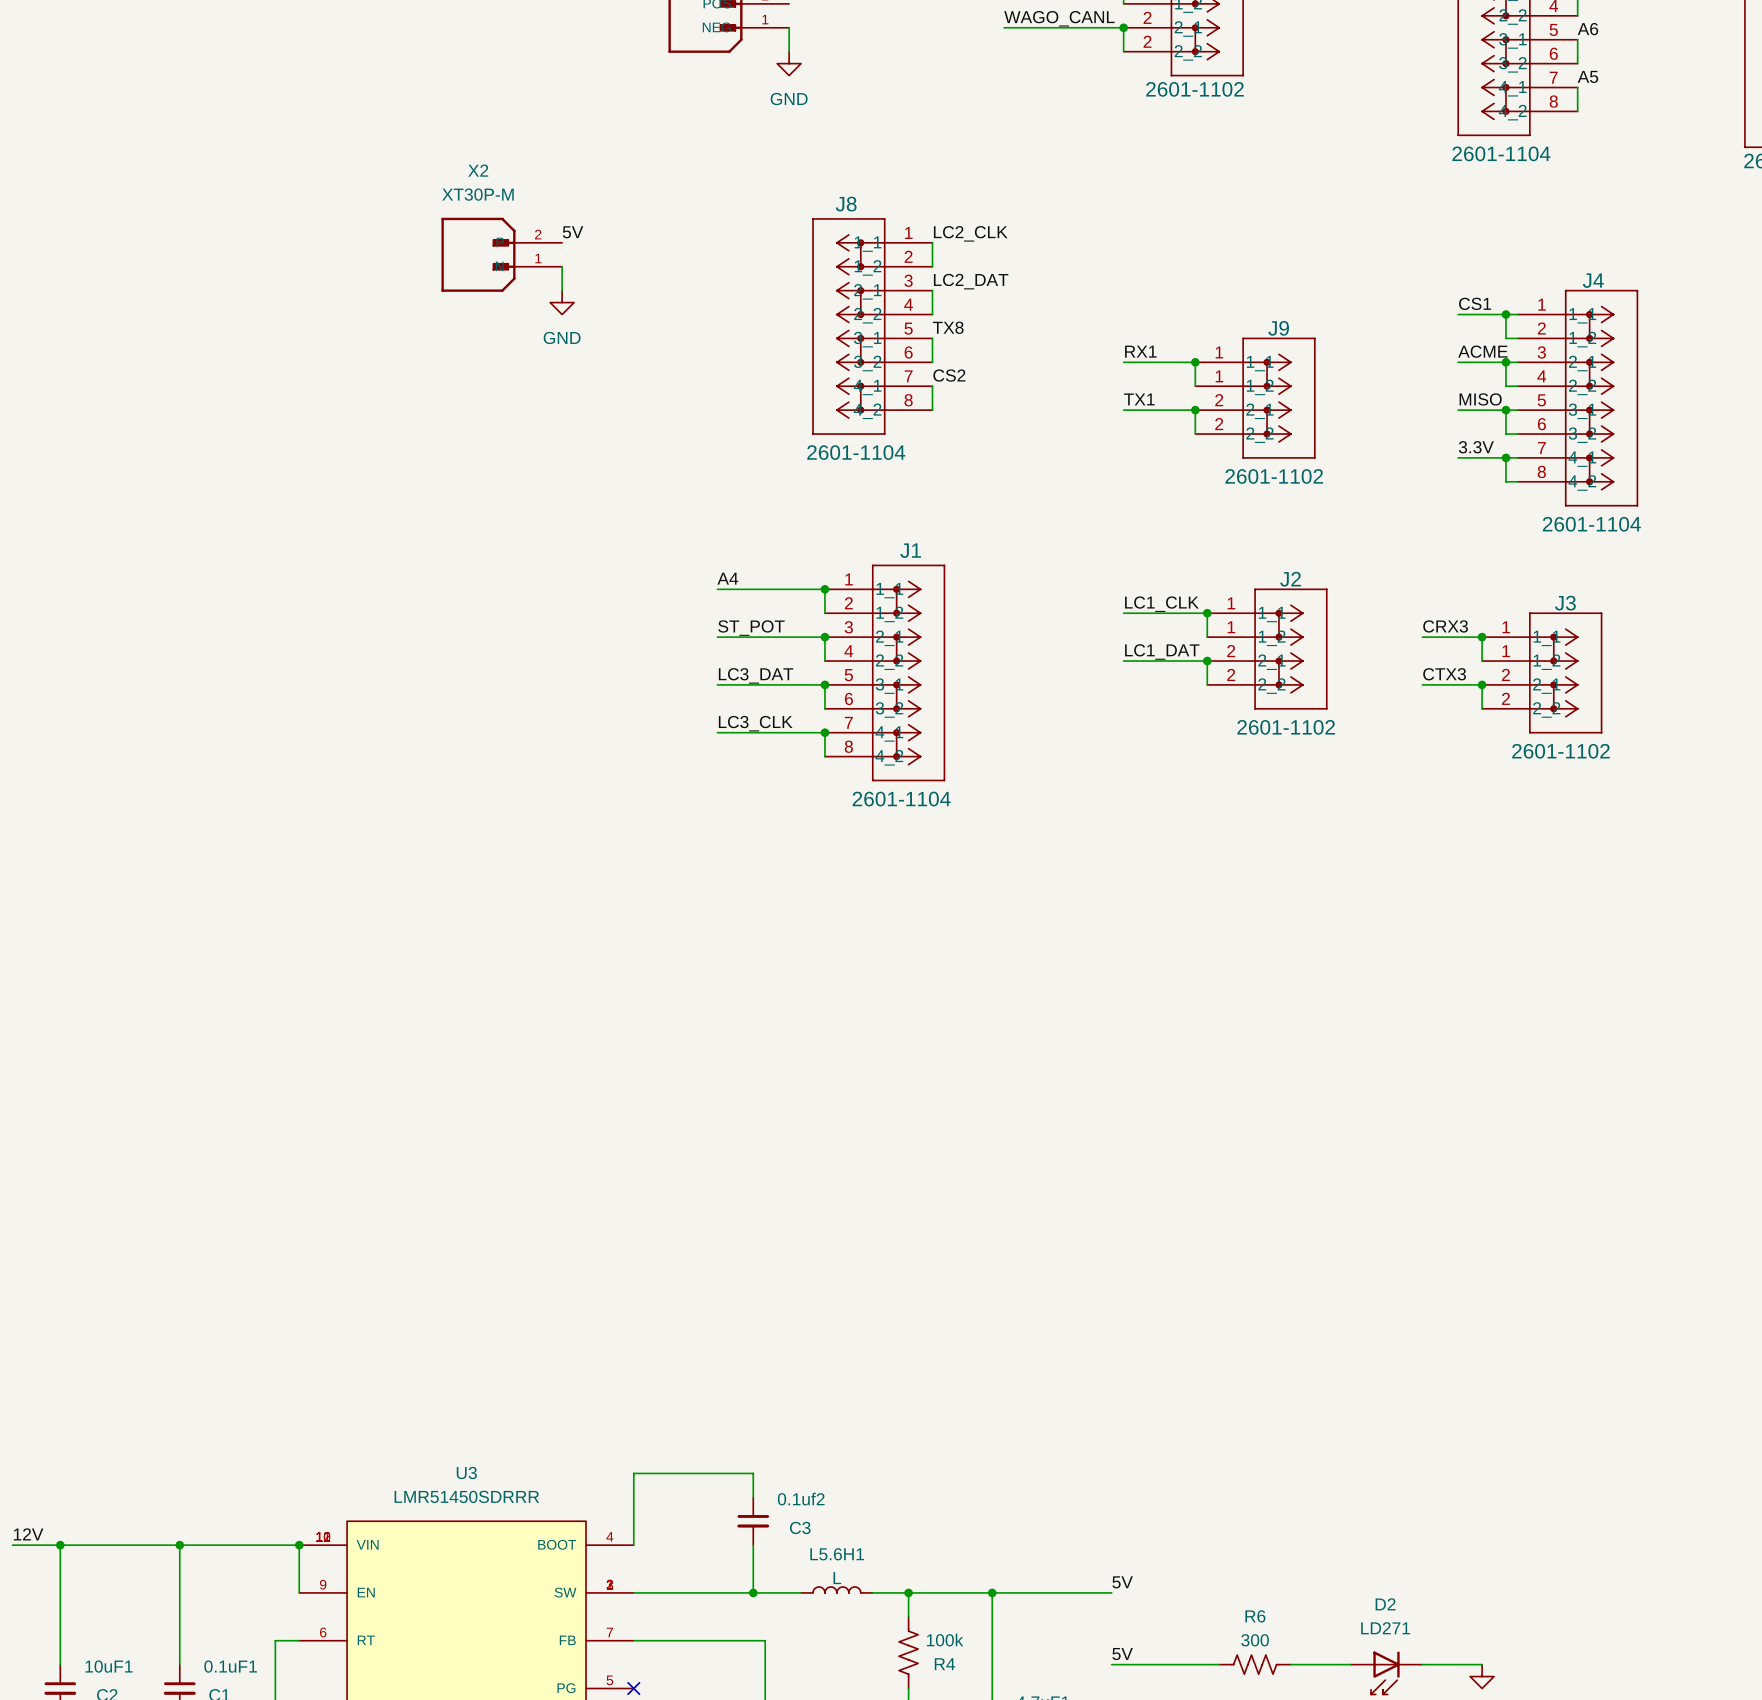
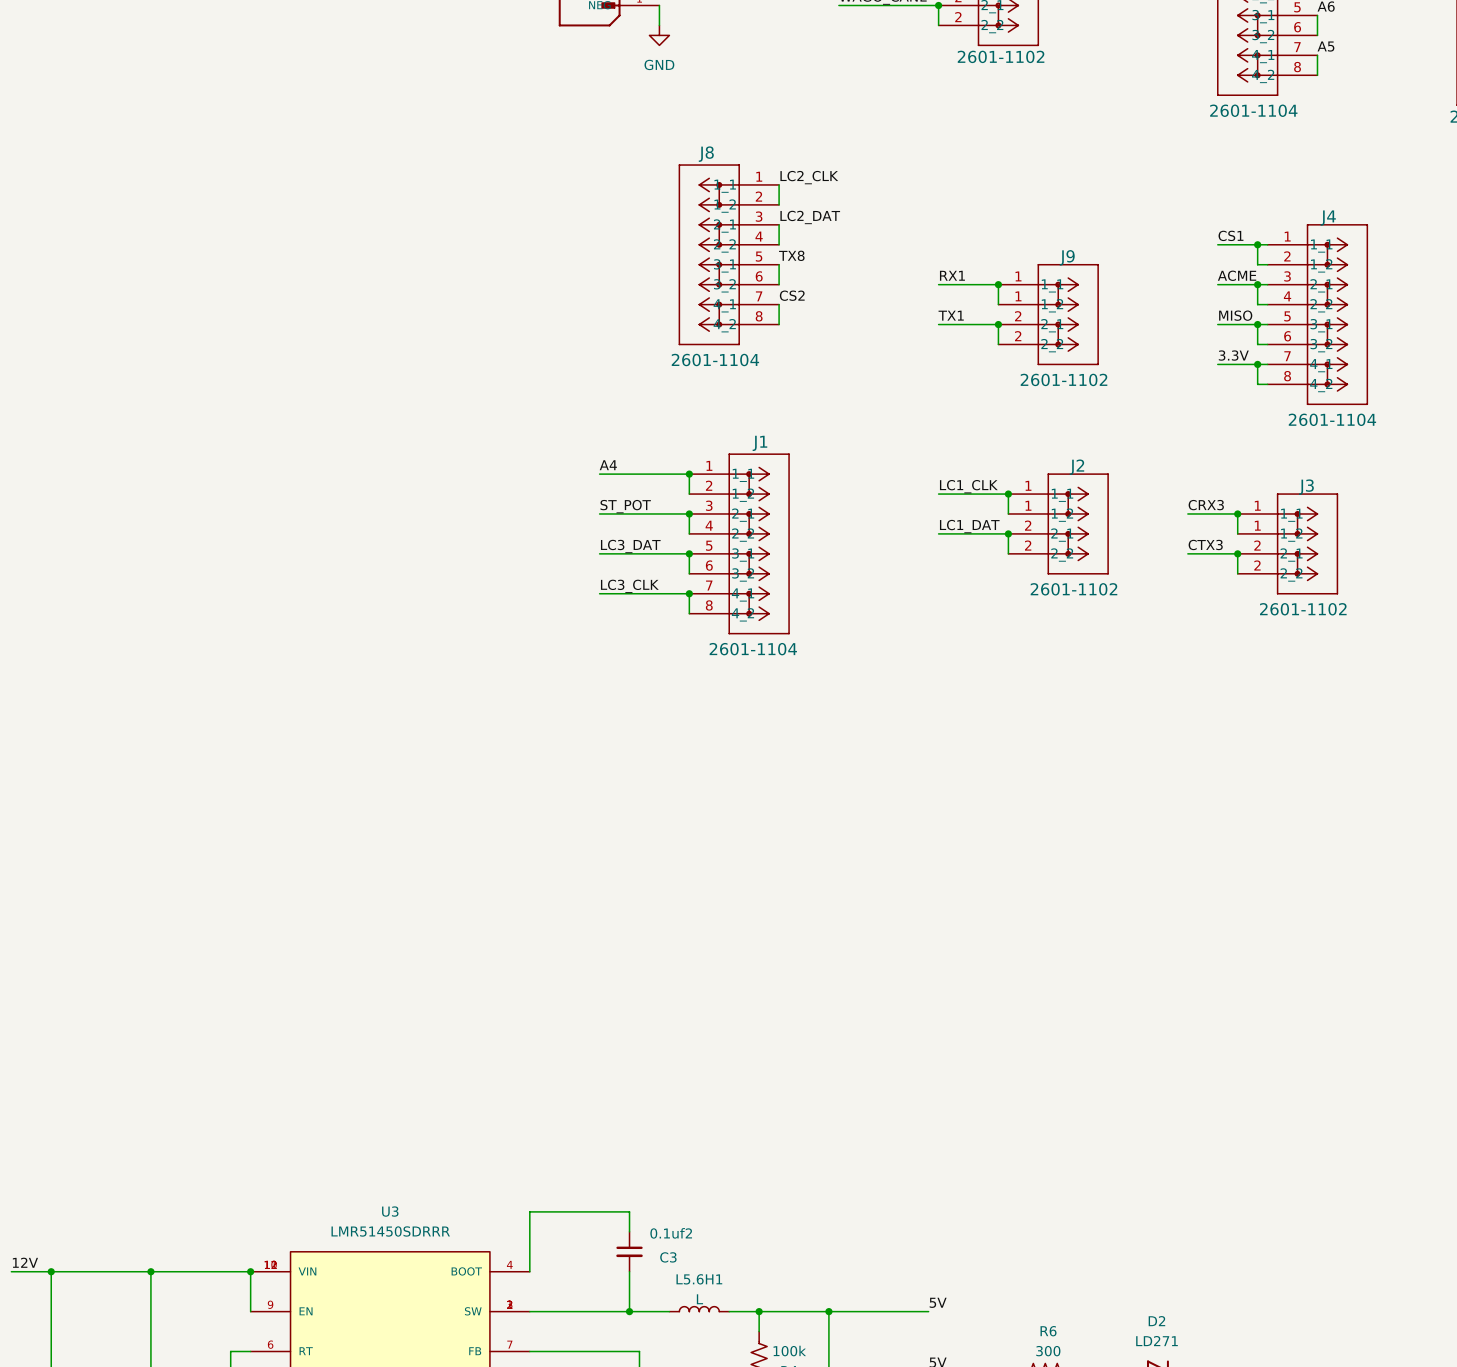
label: 5V (573, 232) -> none
X2: XT30P-M (501, 254) -> none
wire: (562, 266) (562, 290) -> none
power symbol: GND (562, 302) -> none

